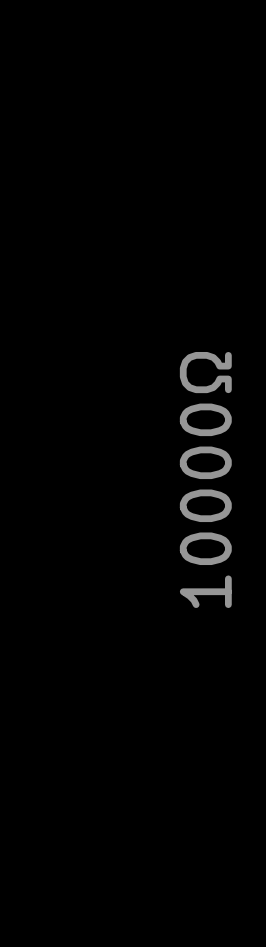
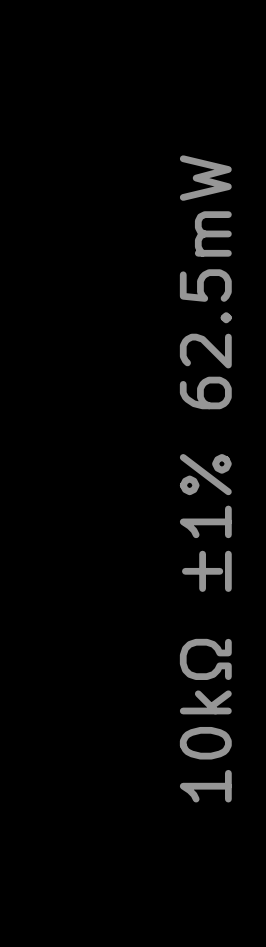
part value: 10000Ω (205, 480) -> 10kΩ ±1% 62.5mW (205, 478)

